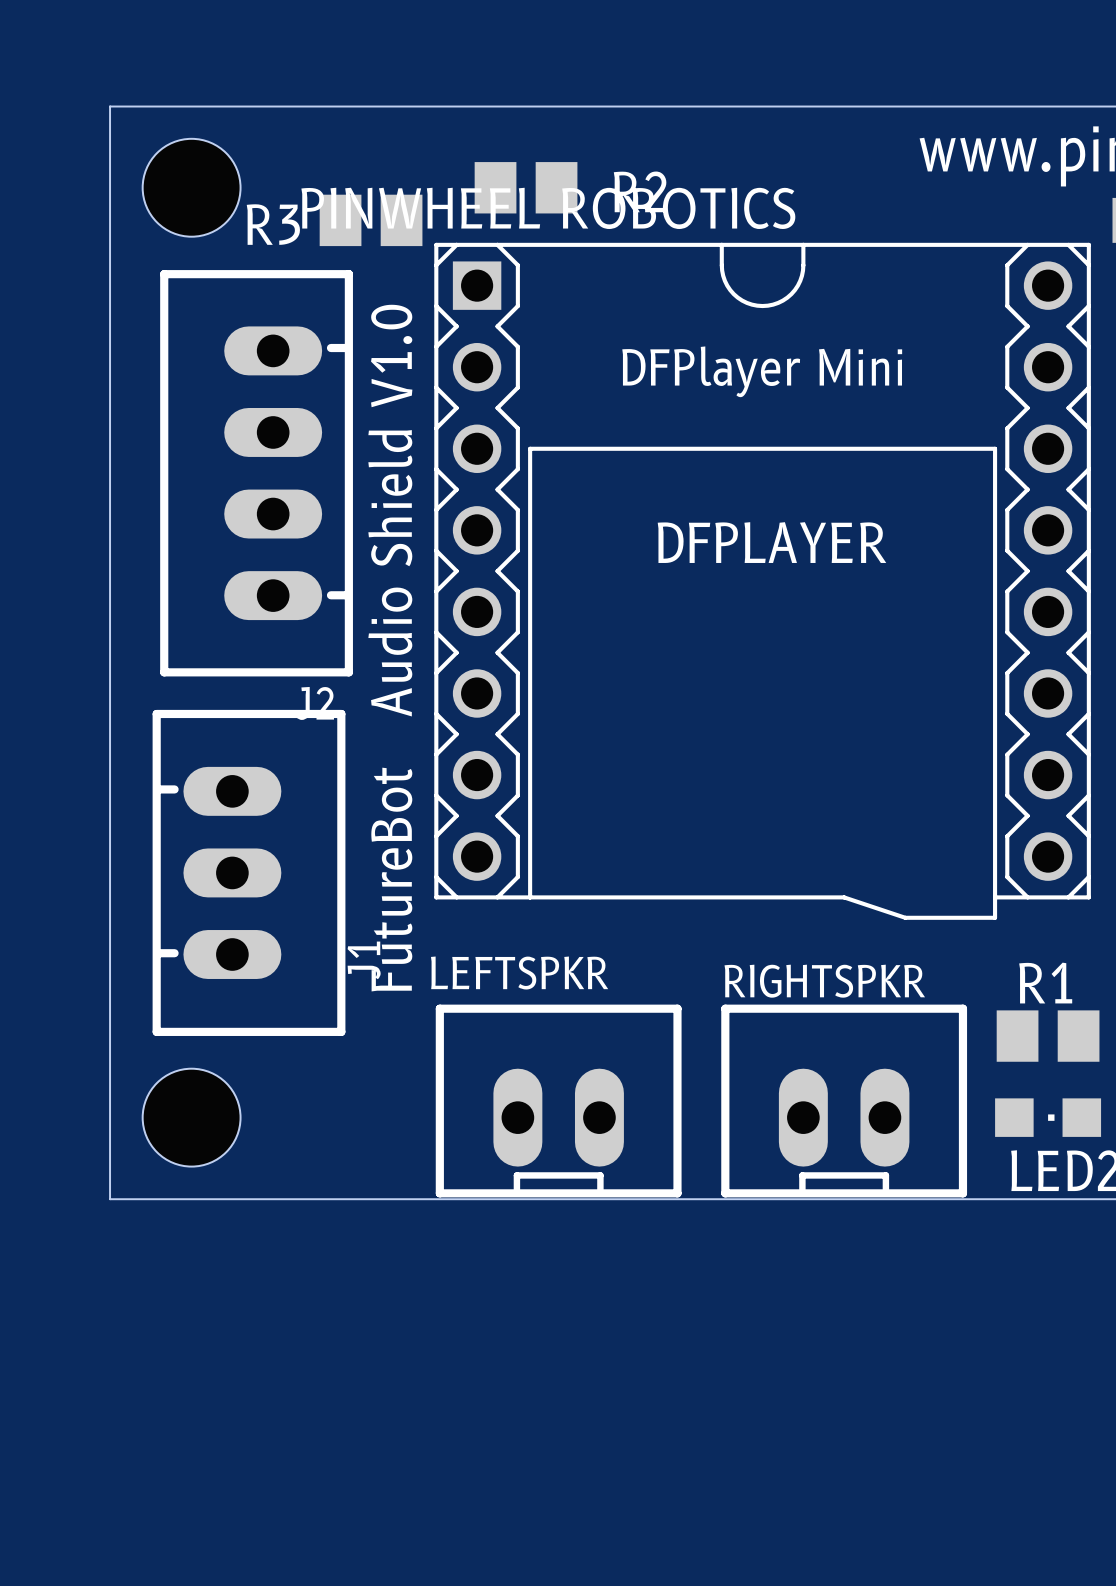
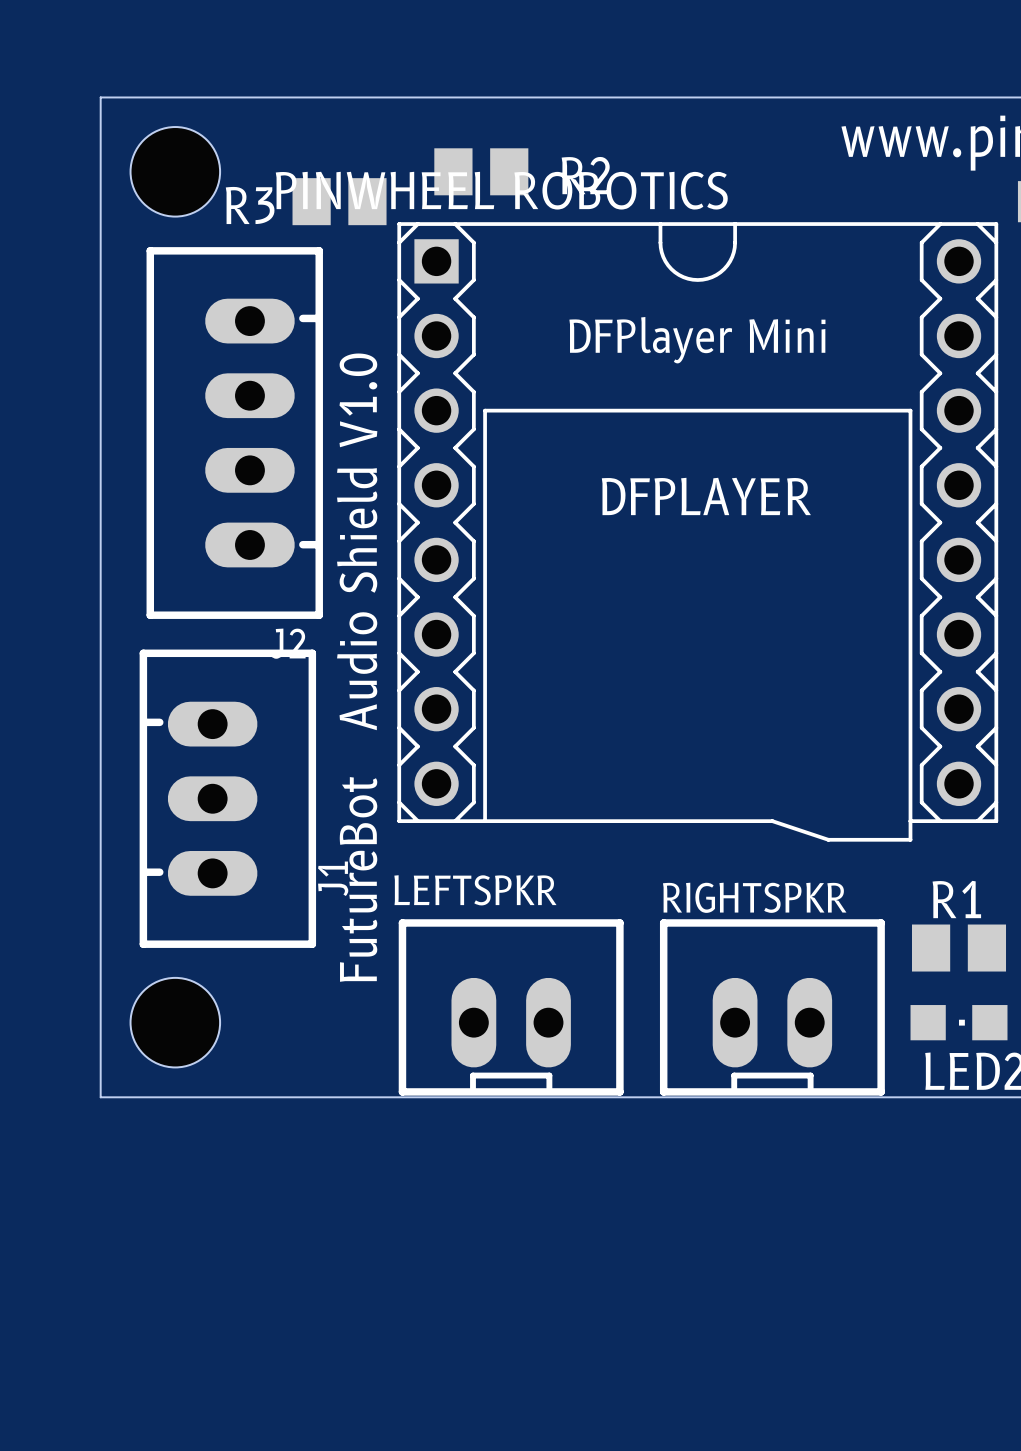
text position: Audio Shield V1.0 (390, 510) -> Audio Shield V1.0 (357, 541)
text position: FutureBot (391, 879) -> FutureBot (358, 879)

